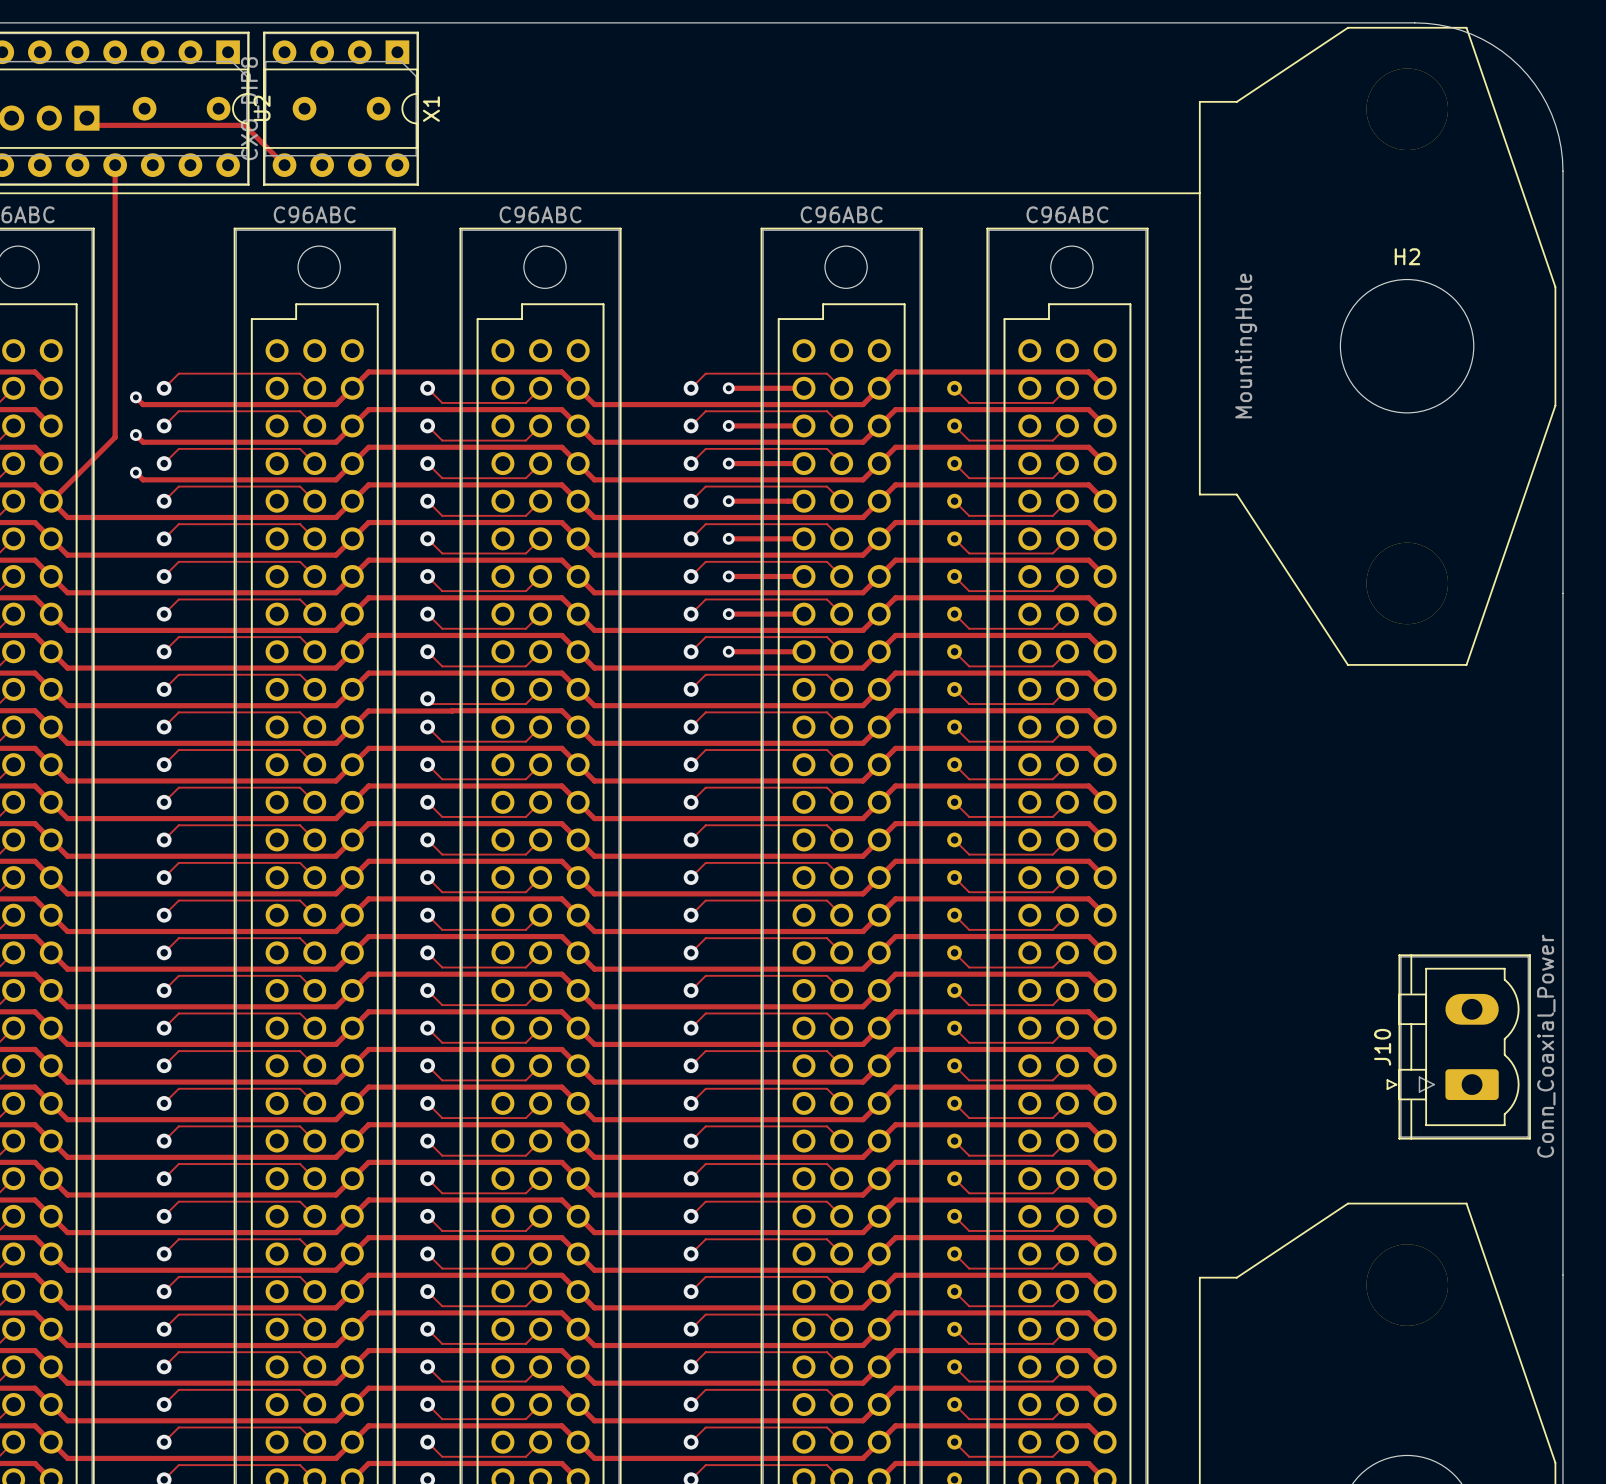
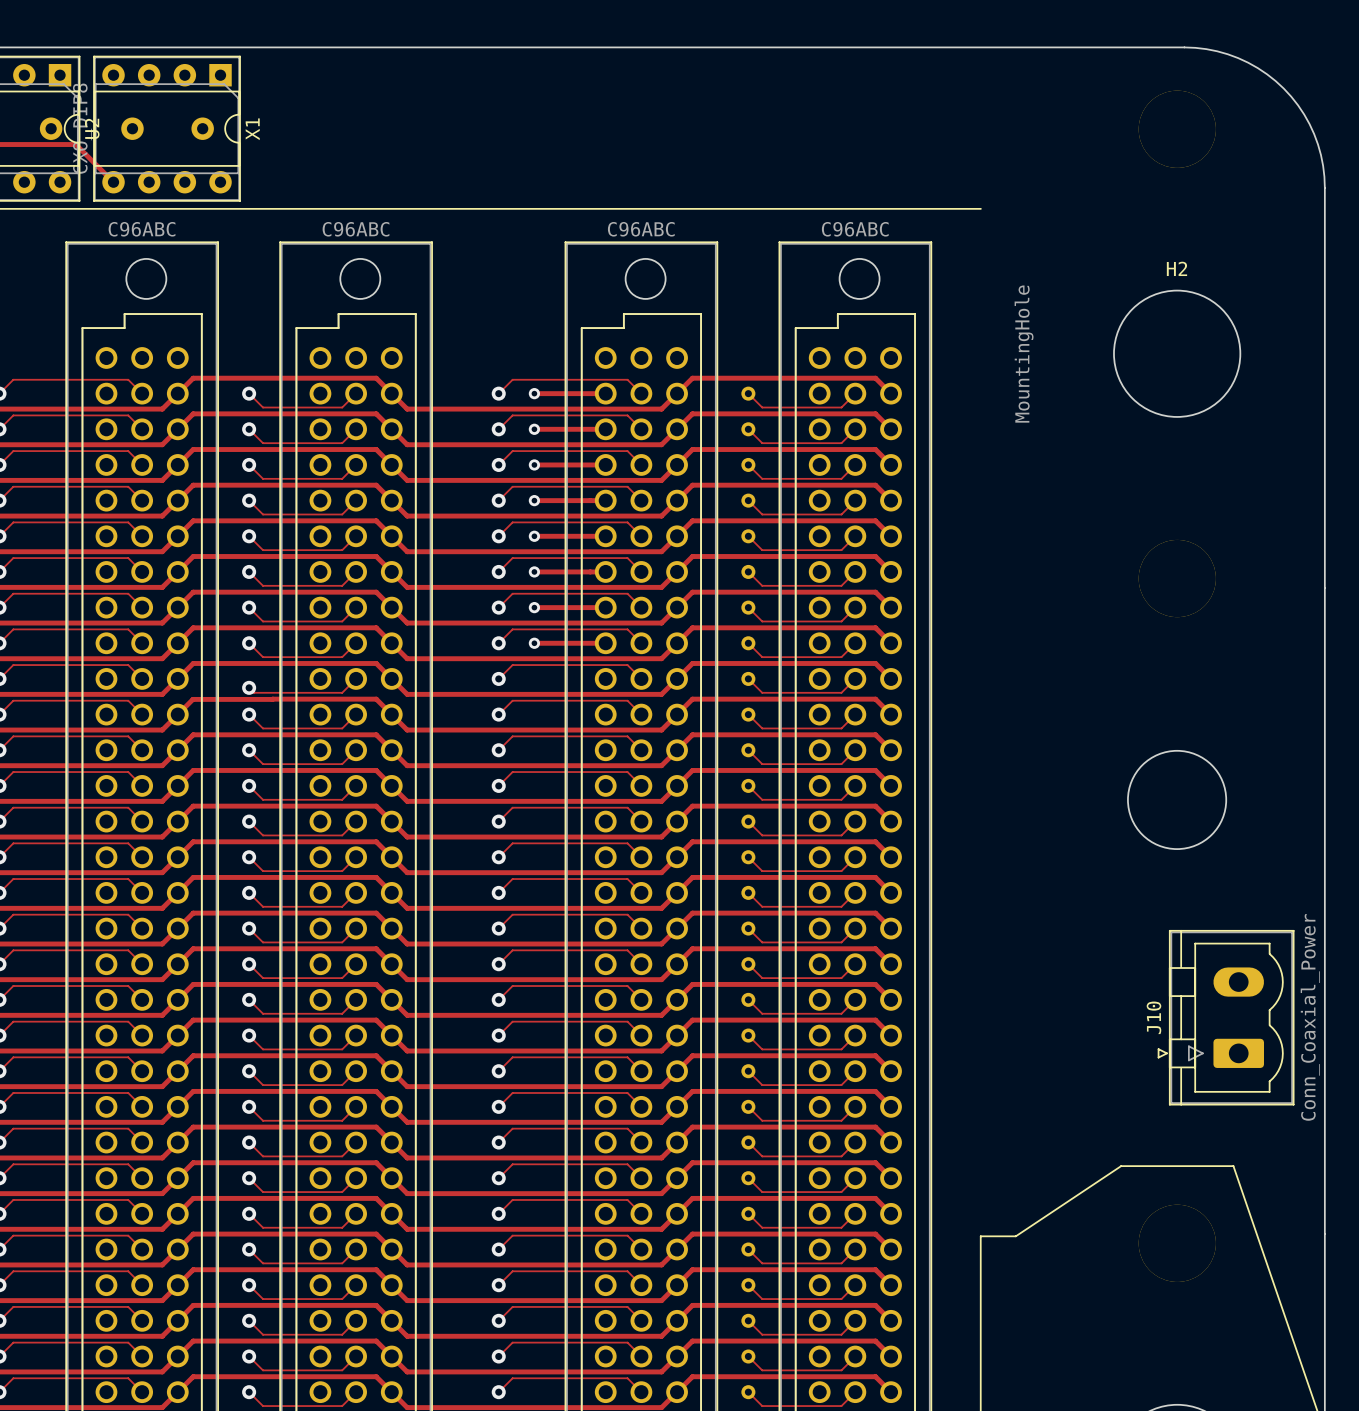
line: (1347, 27) (1466, 27) (1555, 287) (1555, 405) (1466, 664) (1347, 664) (1236, 494) (1199, 494) (1199, 101) (1236, 101) (1347, 27) -> none
round board edge: none -> [1127, 750, 1227, 850]

